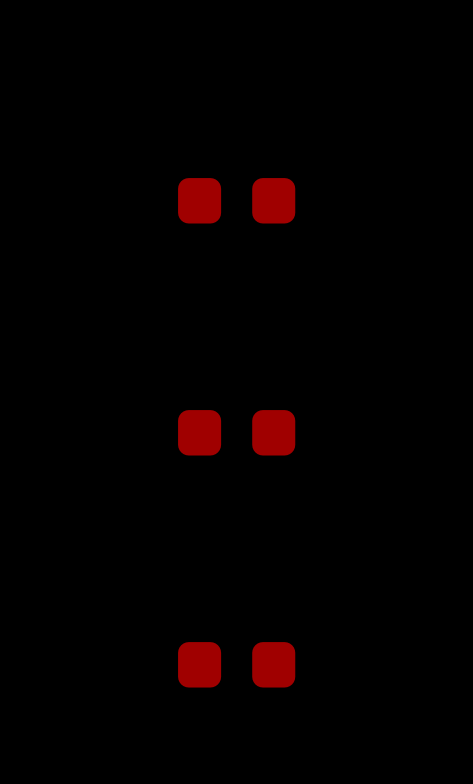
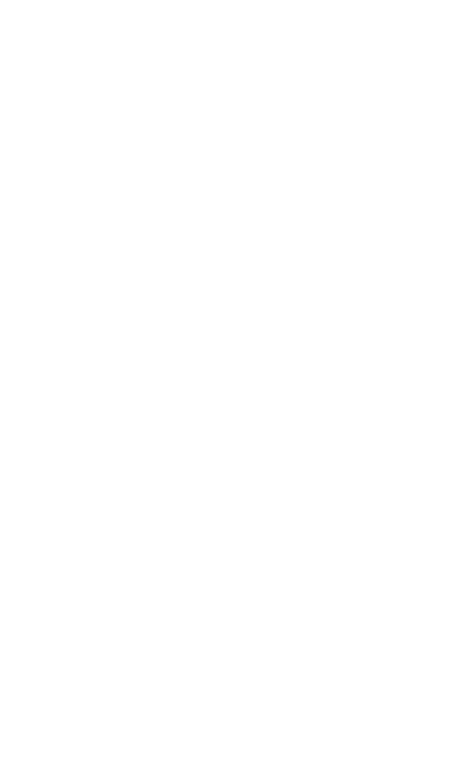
part: (236, 200) -> none
part: (236, 432) -> none
part: (236, 664) -> none

